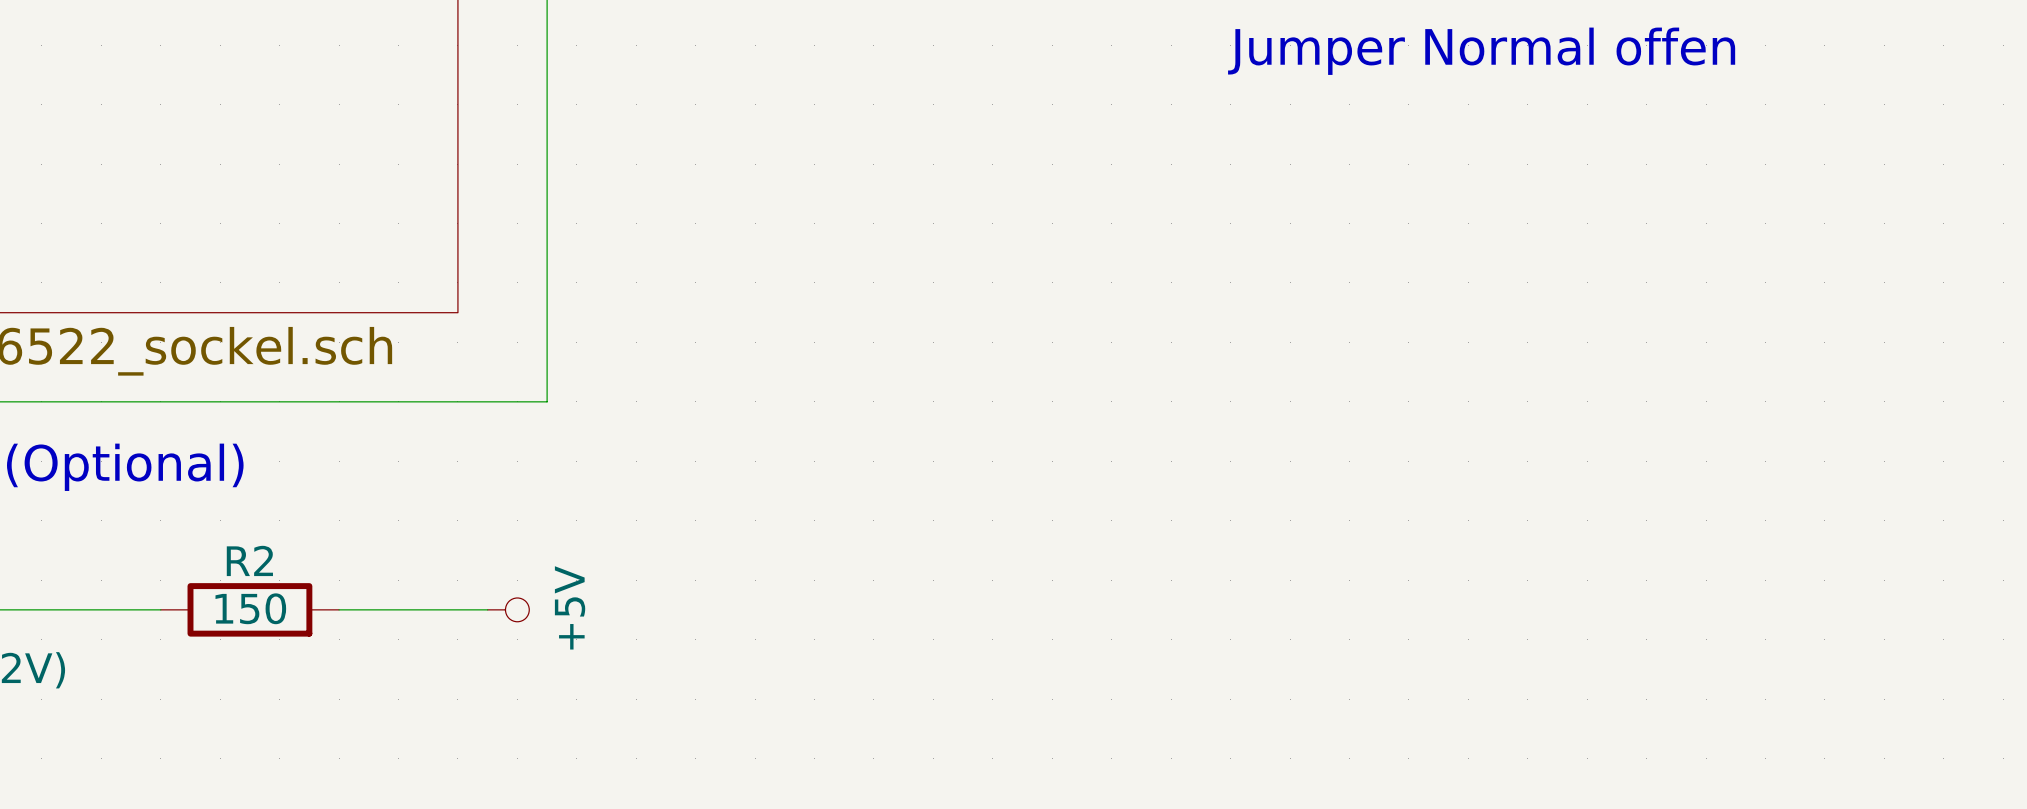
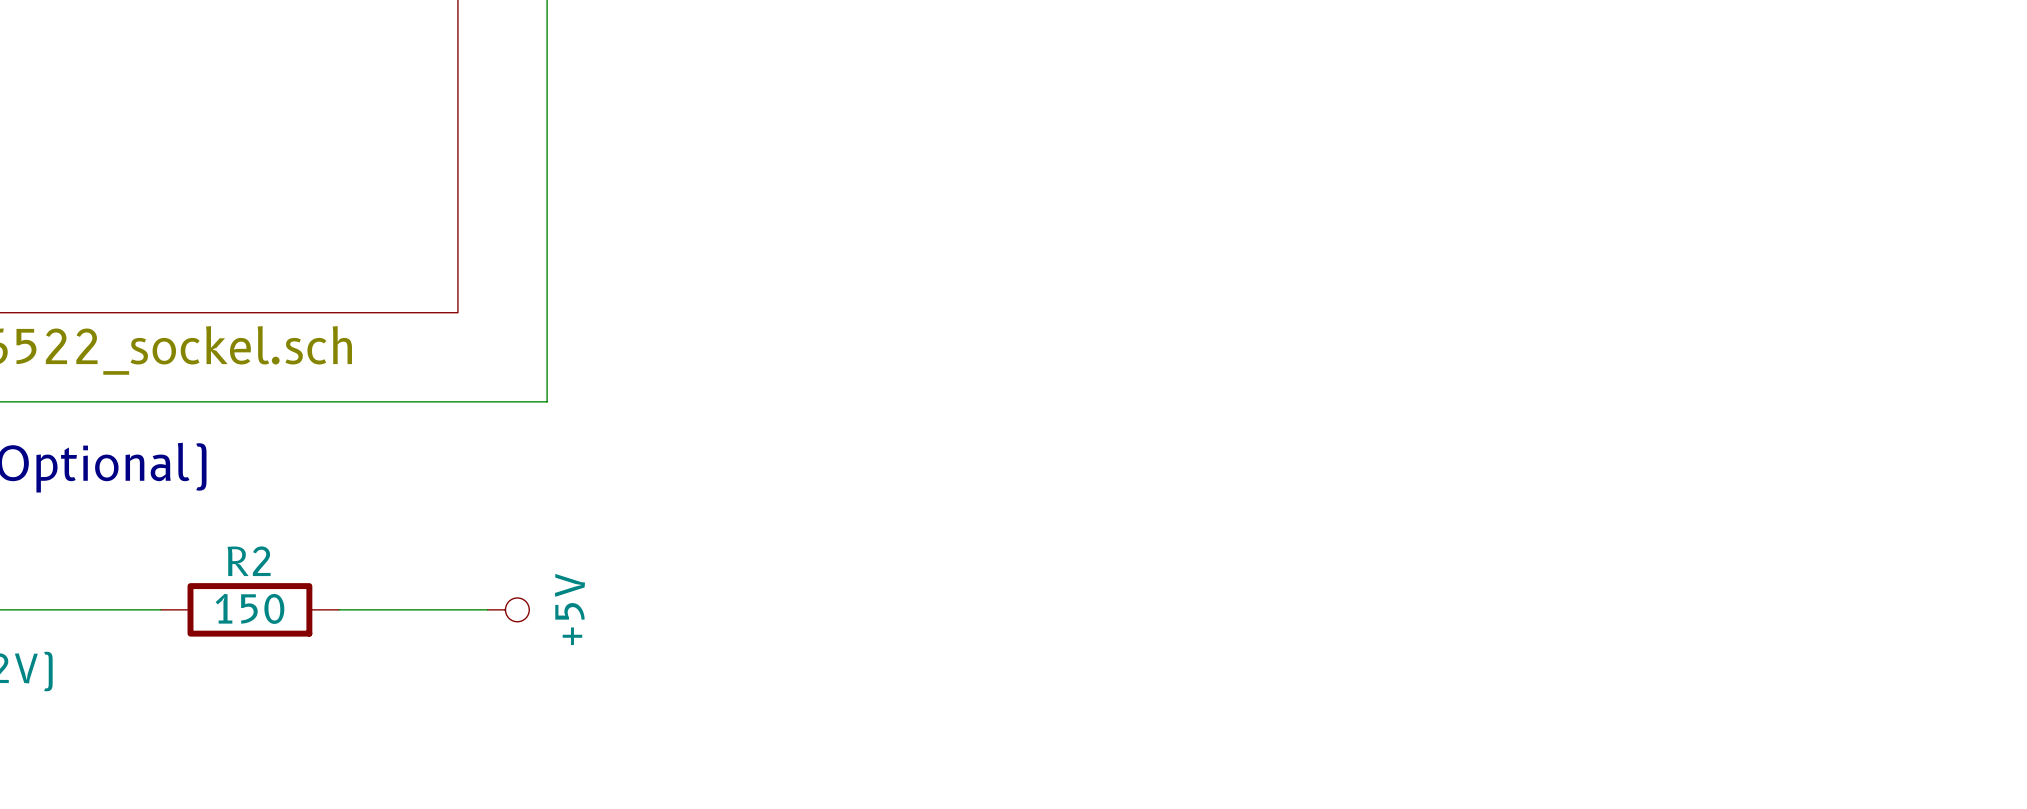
text: Jumper Normal offen (1481, 51) -> none

